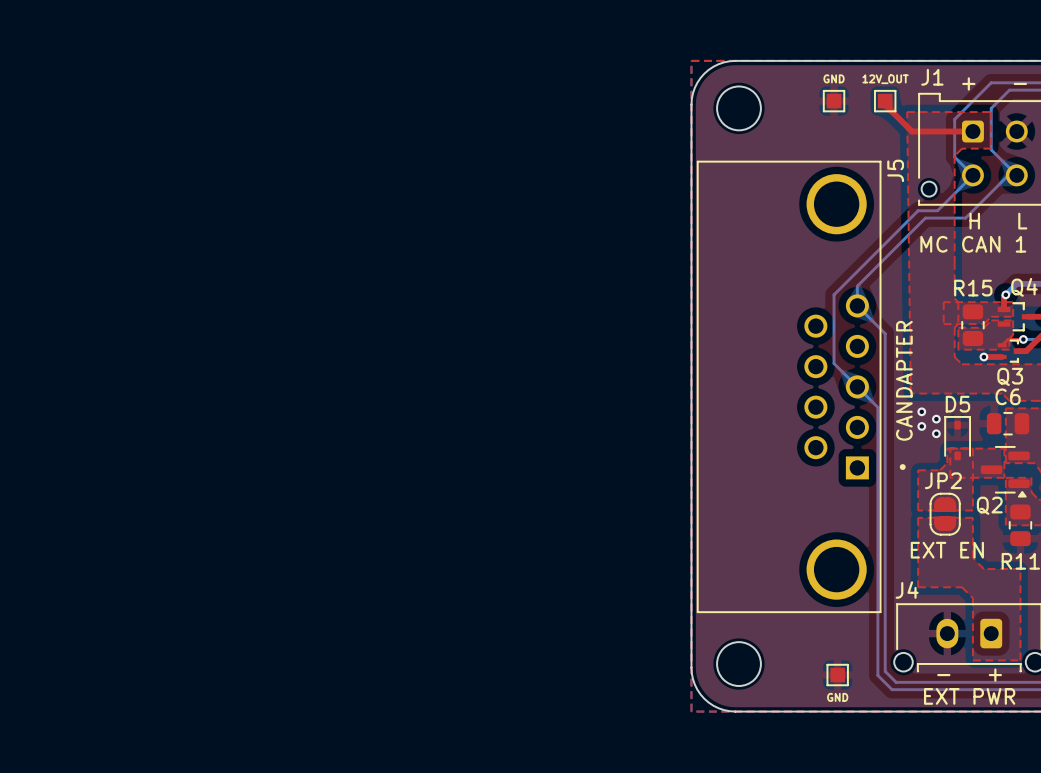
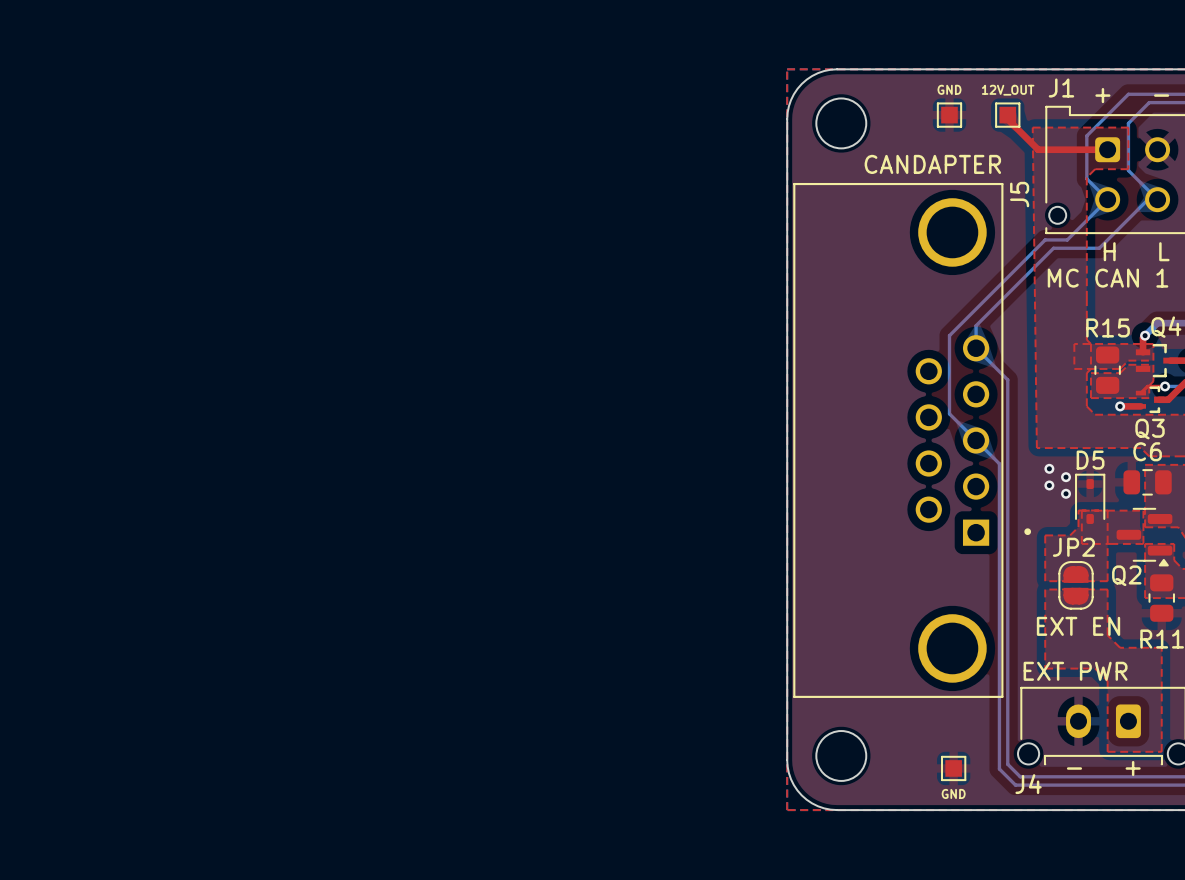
J5 value rotation: 0° (904, 380) -> 90° clockwise (932, 164)
J5 value position: CANDAPTER (904, 380) -> CANDAPTER (932, 164)
J4 name position: J4 (907, 590) -> J4 (1028, 784)
J4 value position: EXT PWR (969, 696) -> EXT PWR (1075, 671)

